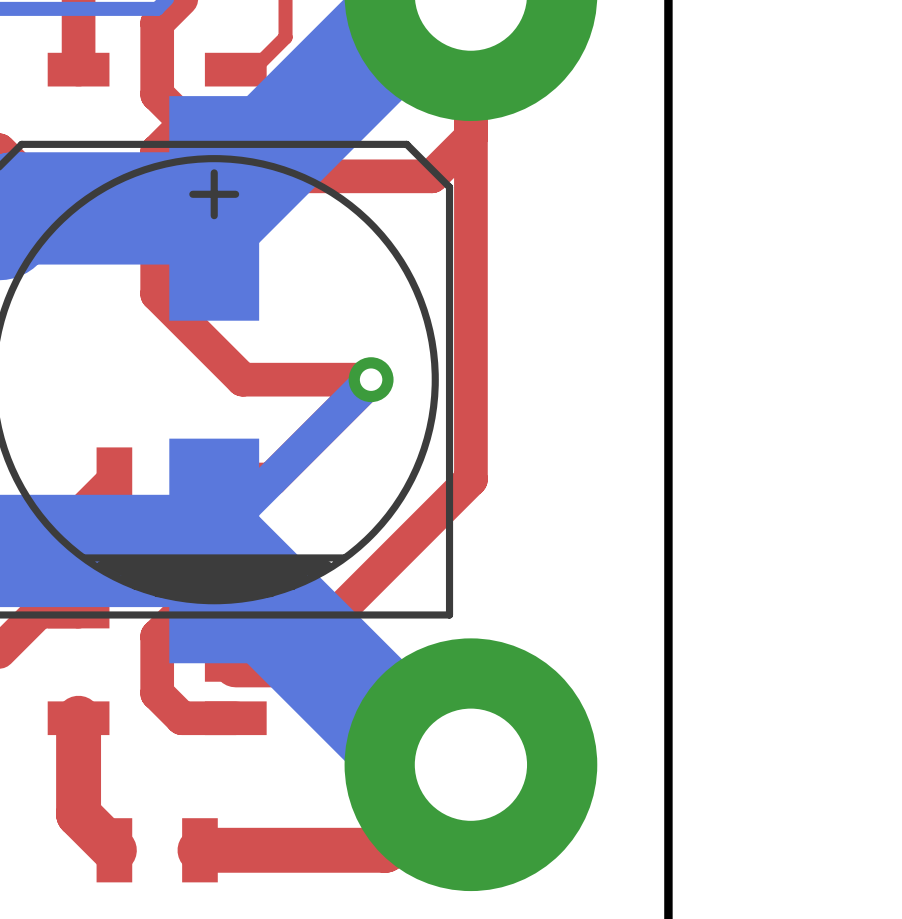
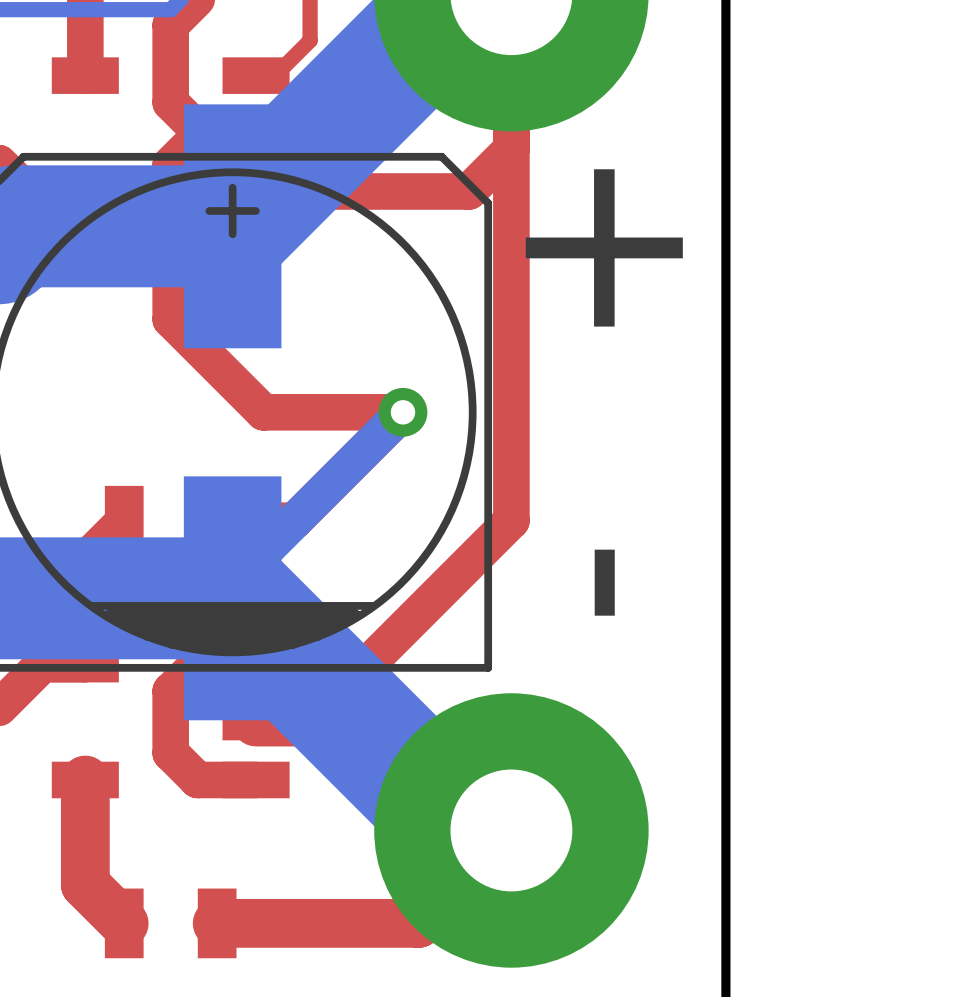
text: none -> + (604, 247)
text: none -> - (604, 582)

